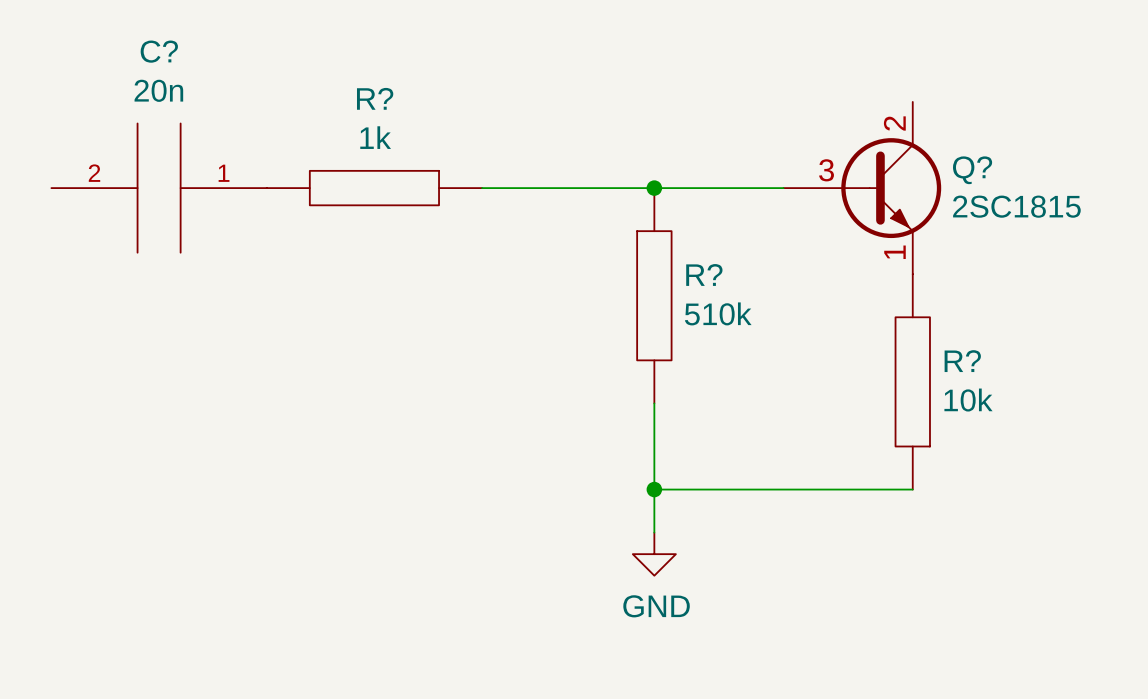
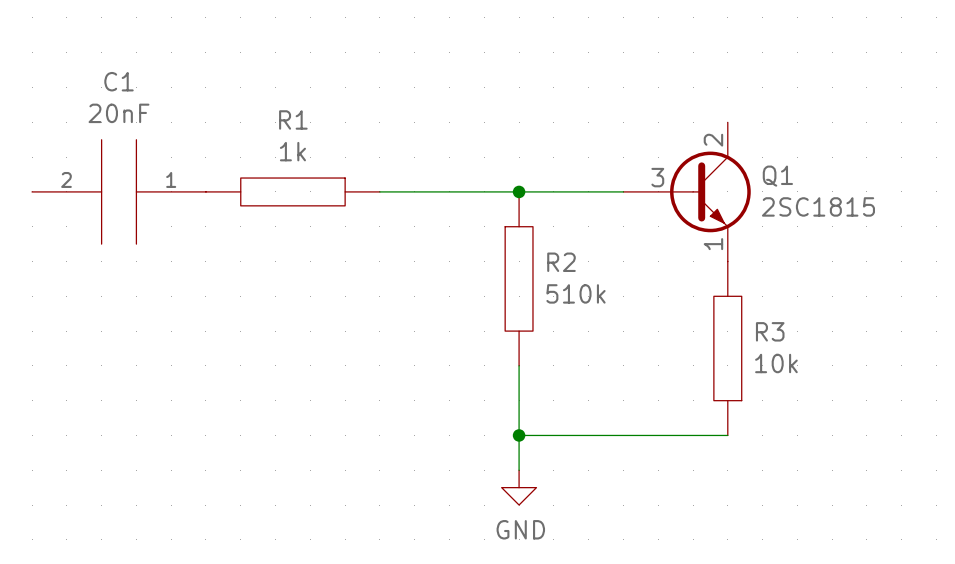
C? name: C? (159, 51) -> C1 (119, 81)
C? value: 20n (158, 90) -> 20nF (119, 113)
R? name: R? (375, 98) -> R1 (293, 119)
Q? name: Q? (972, 170) -> Q1 (777, 176)
R? name: R? (704, 274) -> R2 (561, 262)
R? name: R? (962, 361) -> R3 (770, 331)

